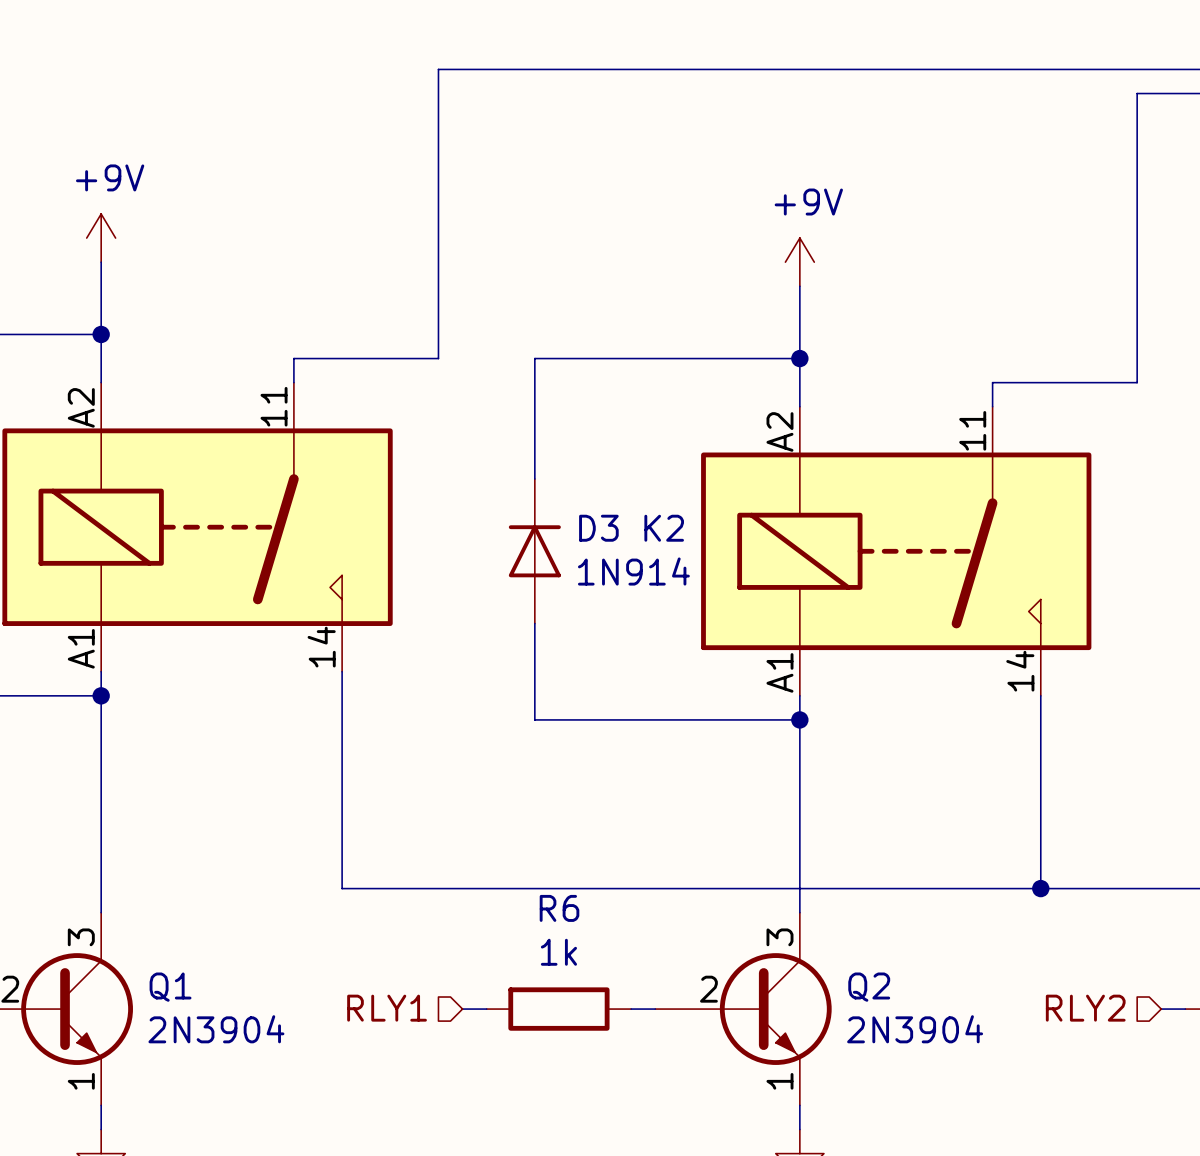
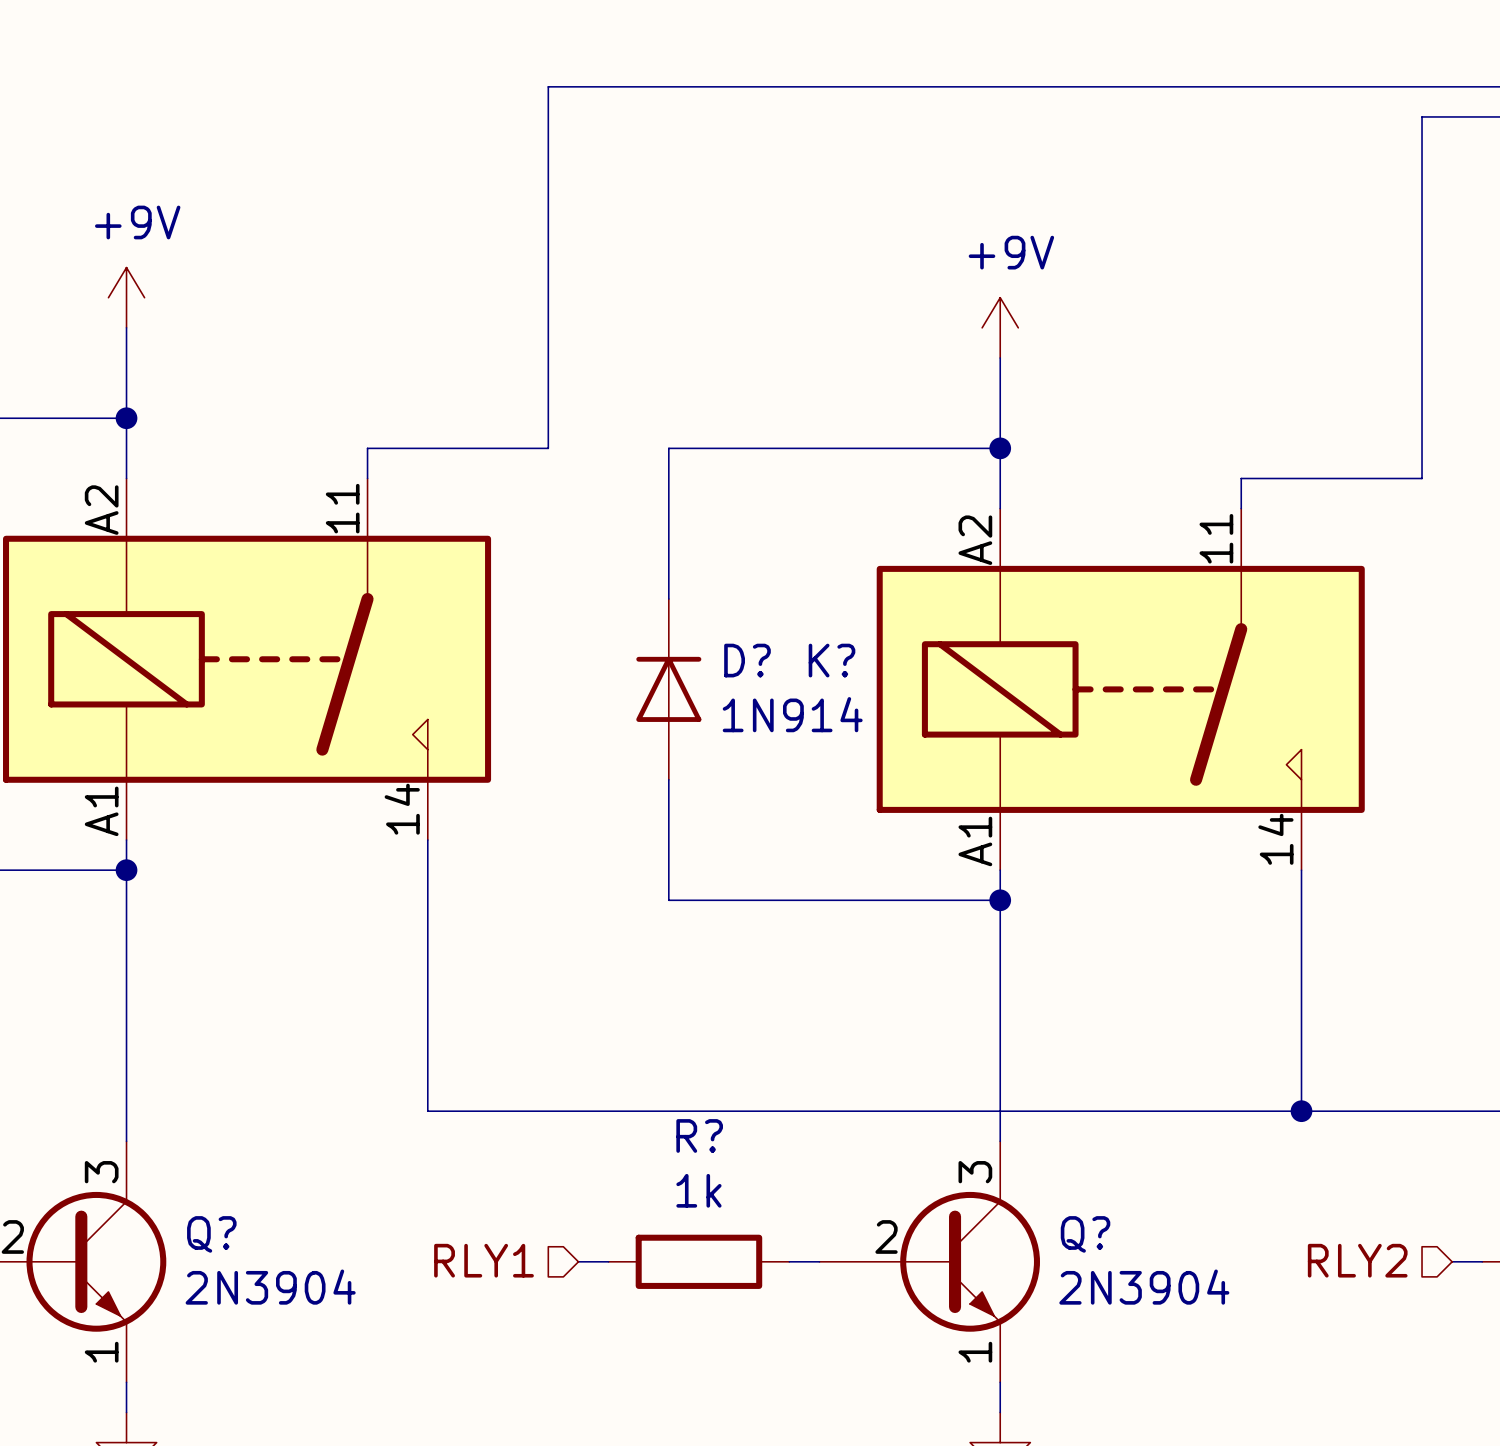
D3 name: D3 (598, 528) -> D? (747, 660)
K2 name: K2 (664, 528) -> K? (832, 660)
R6 name: R6 (559, 908) -> R? (699, 1135)
Q1 name: Q1 (170, 987) -> Q? (211, 1234)
Q2 name: Q2 (869, 987) -> Q? (1085, 1234)

